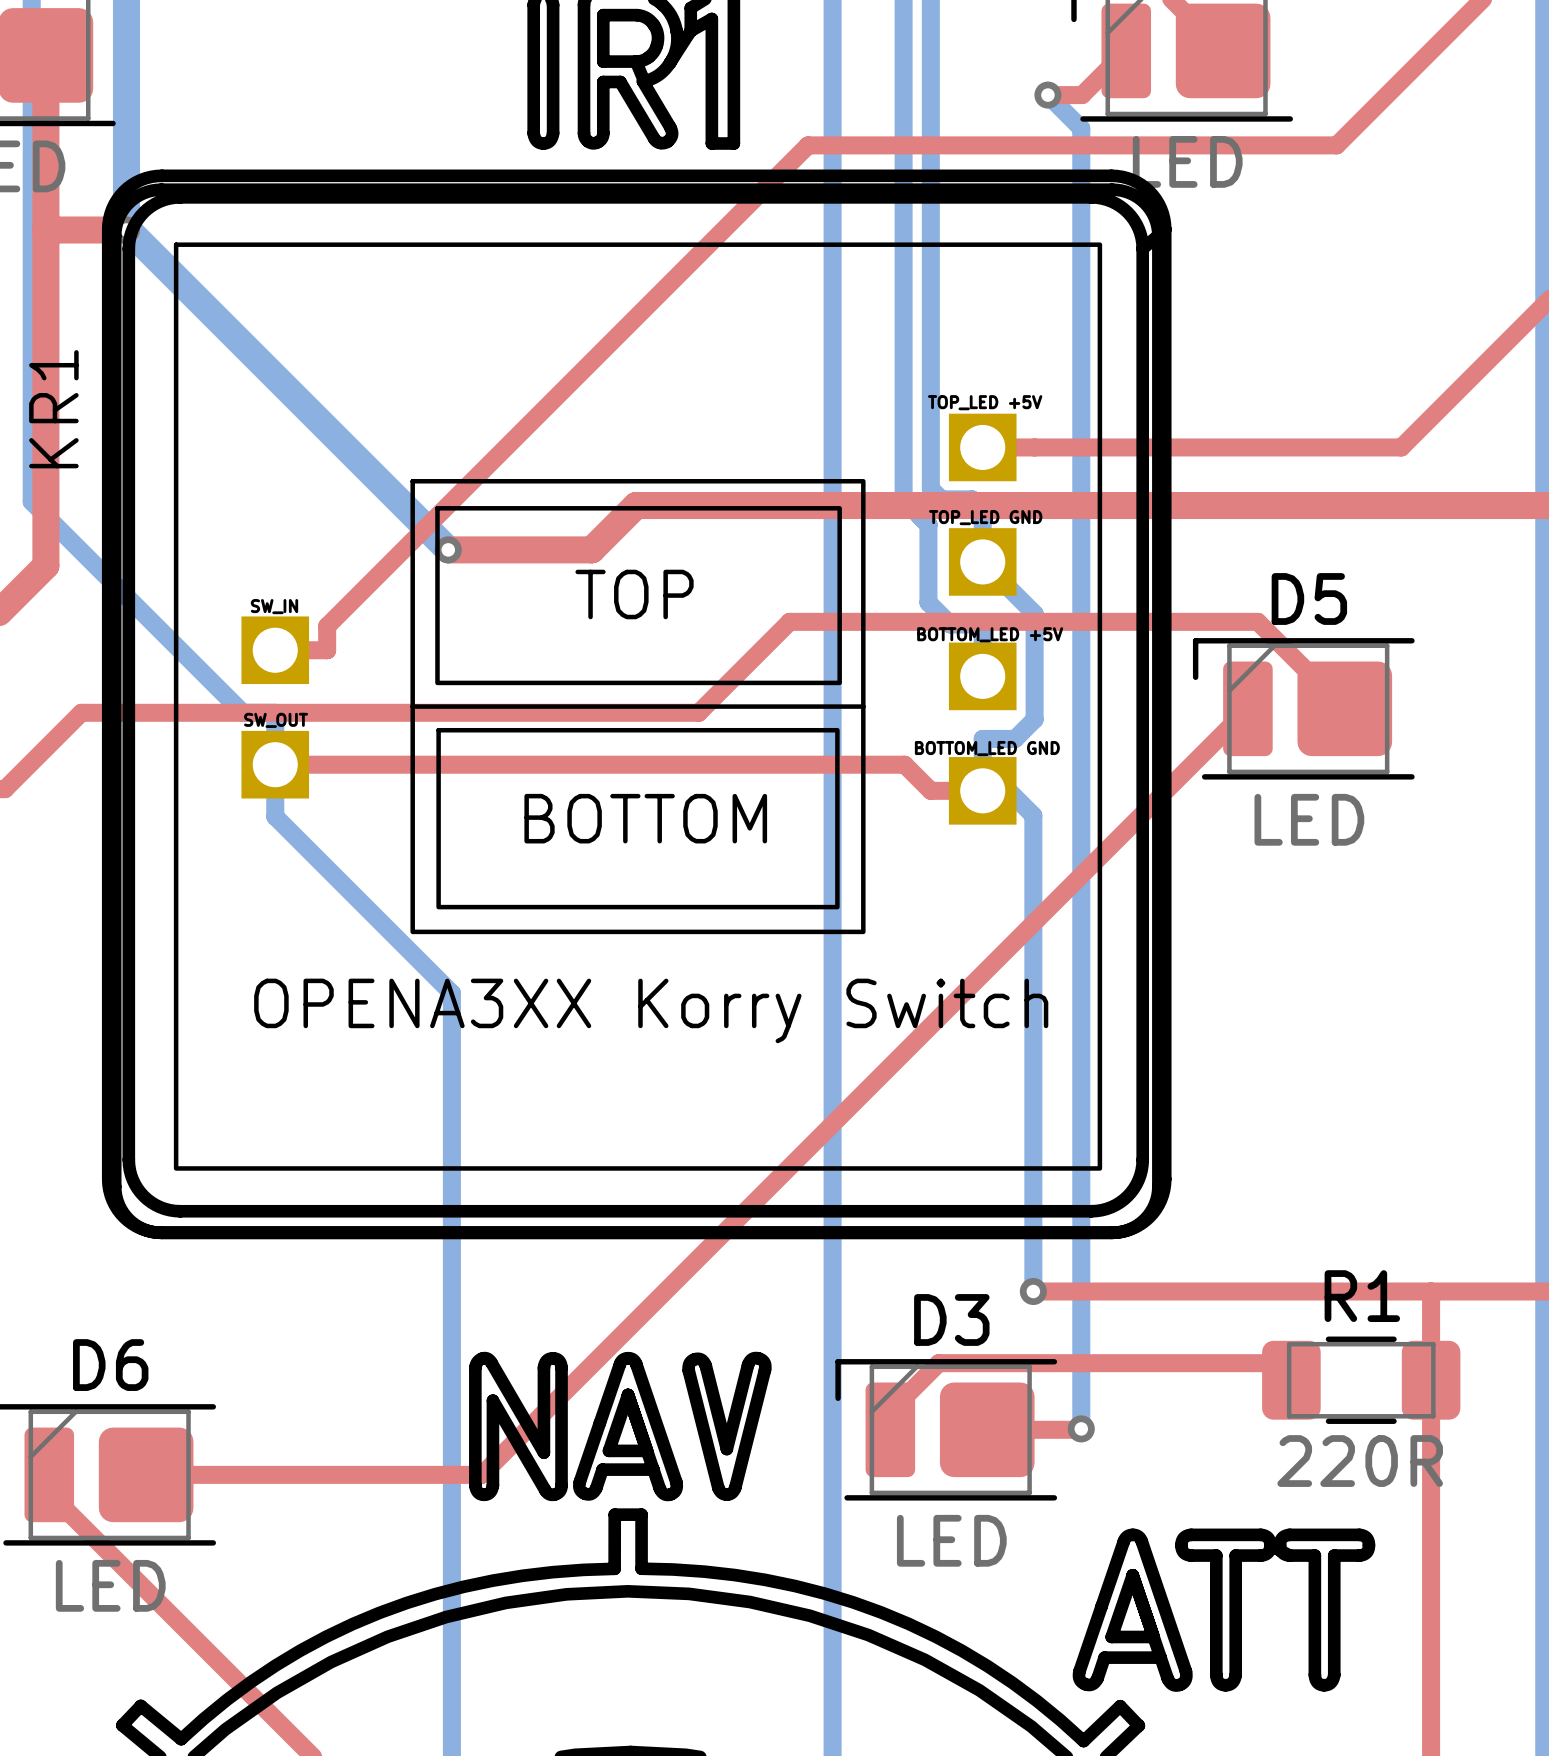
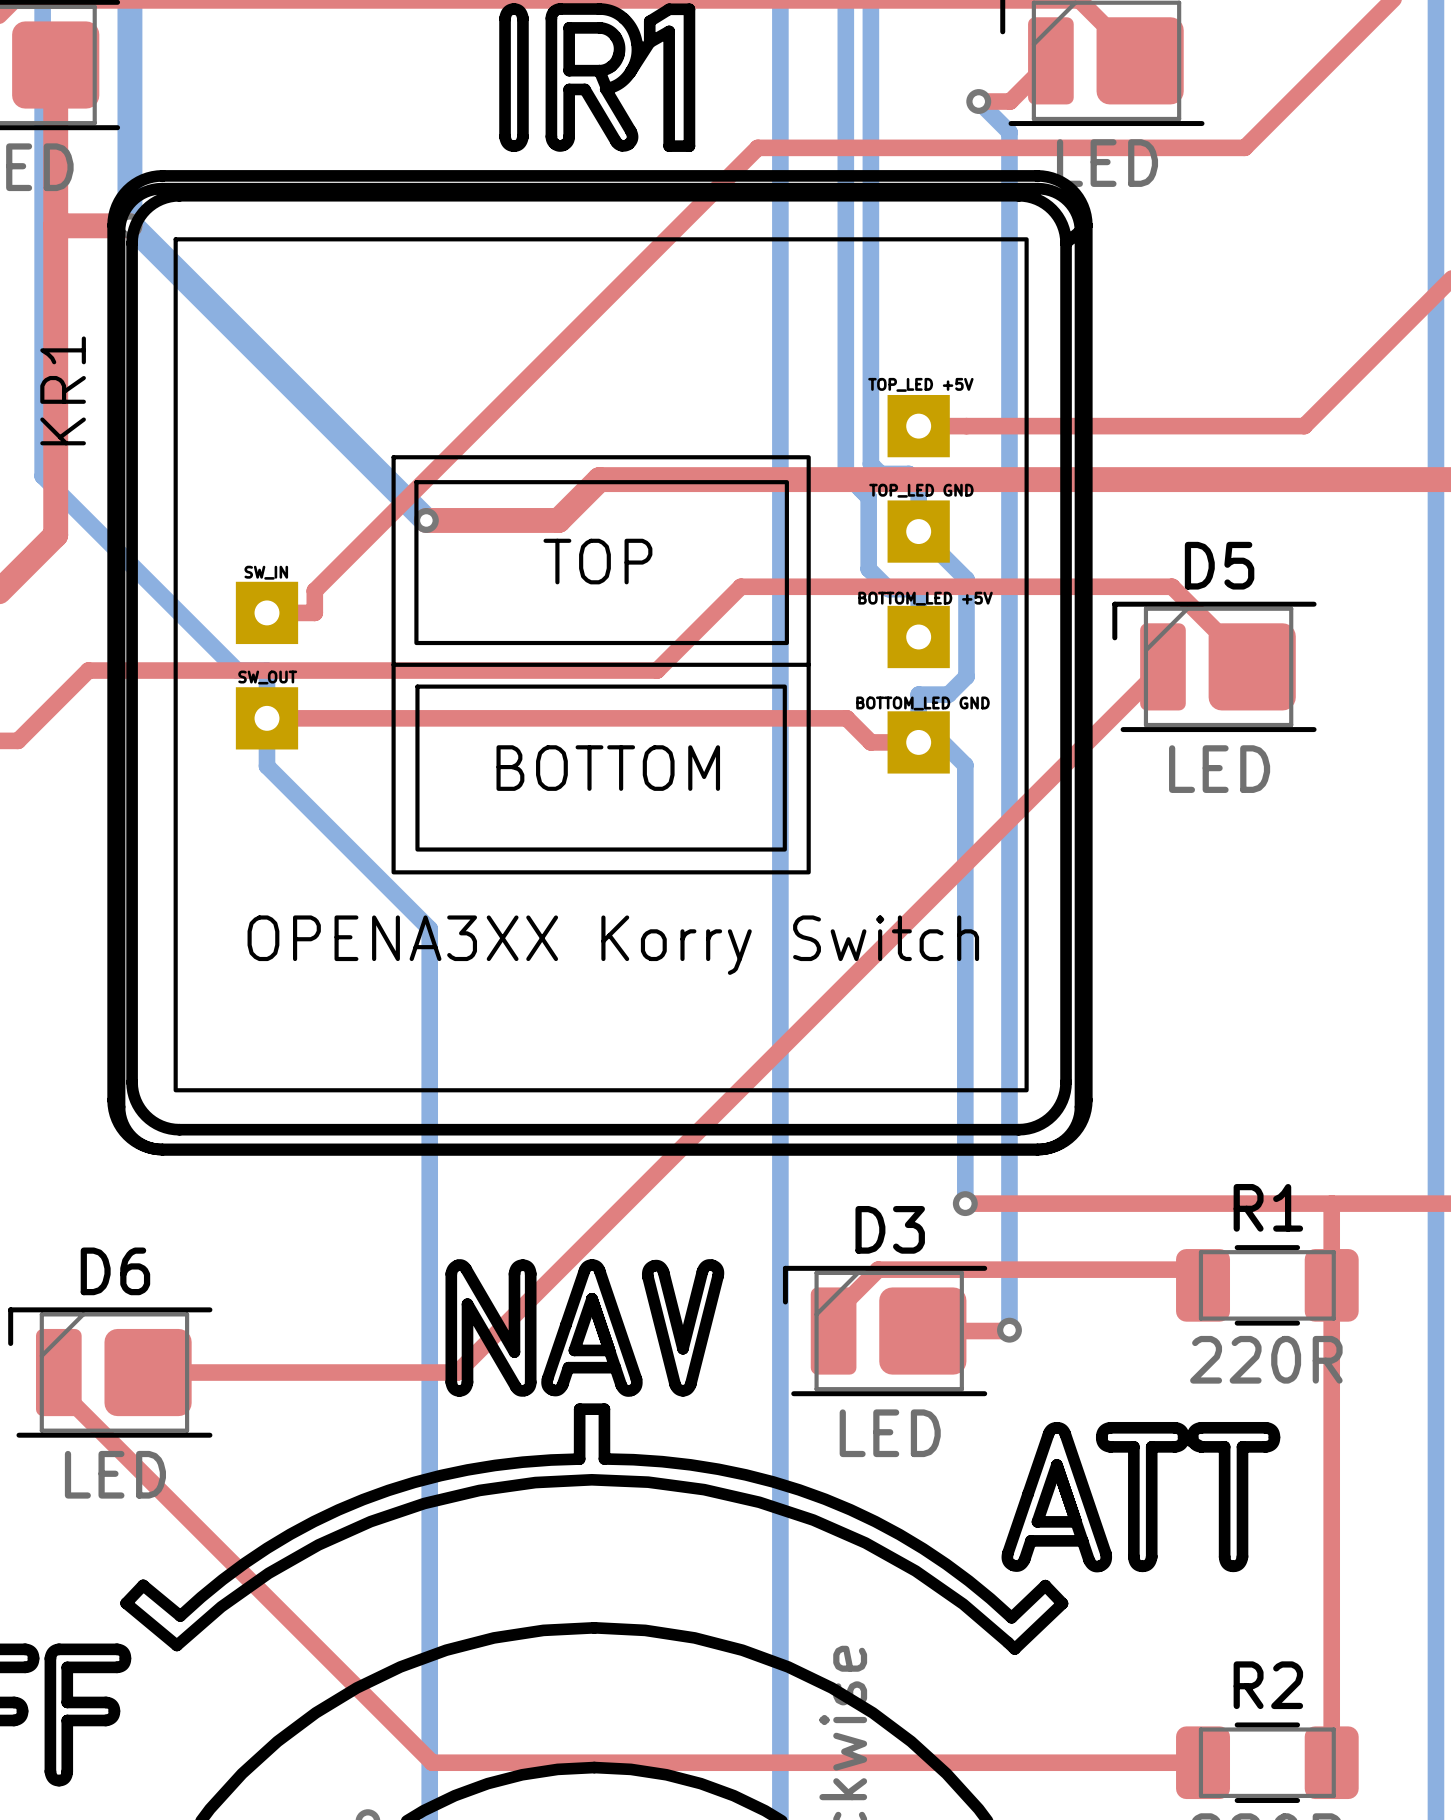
KR1 footprint: [173, 242, 1103, 1171] -> [173, 237, 1029, 1093]

